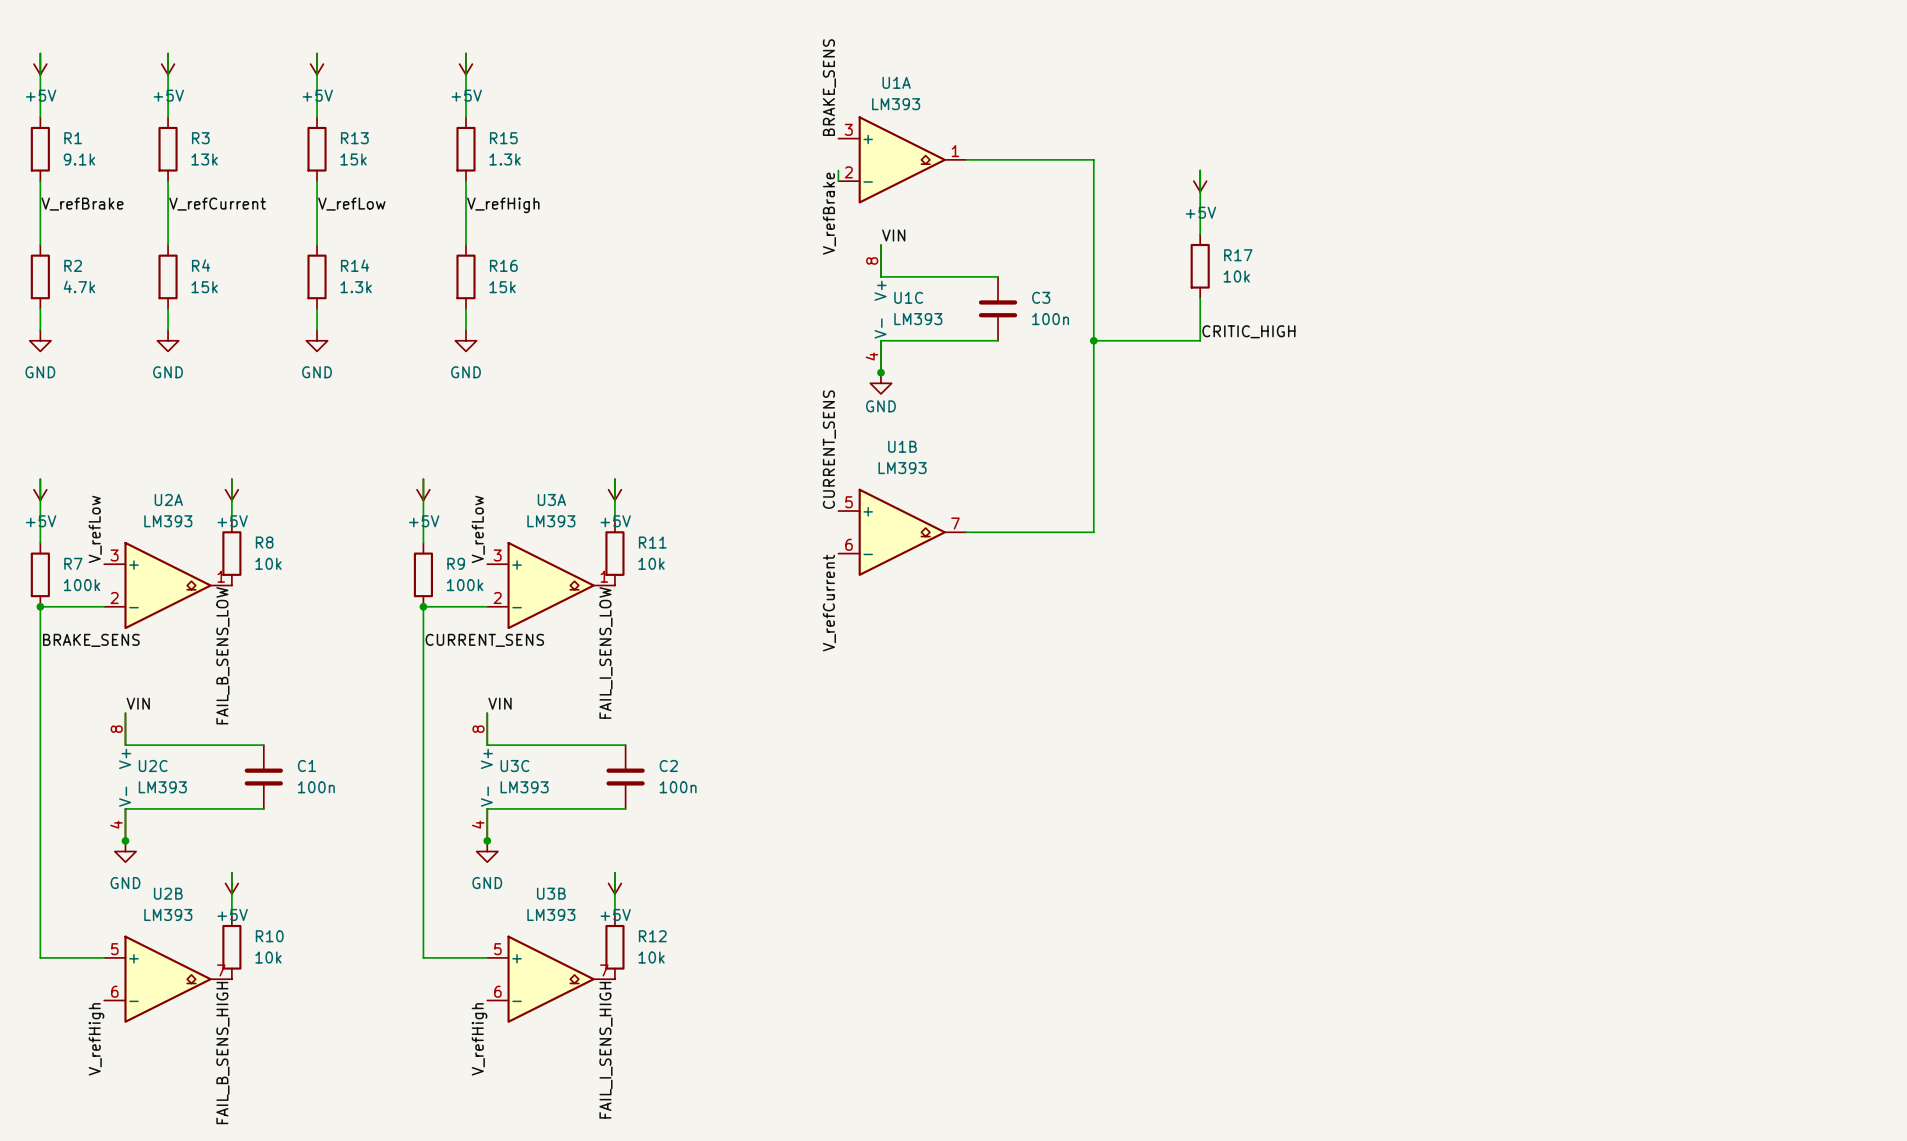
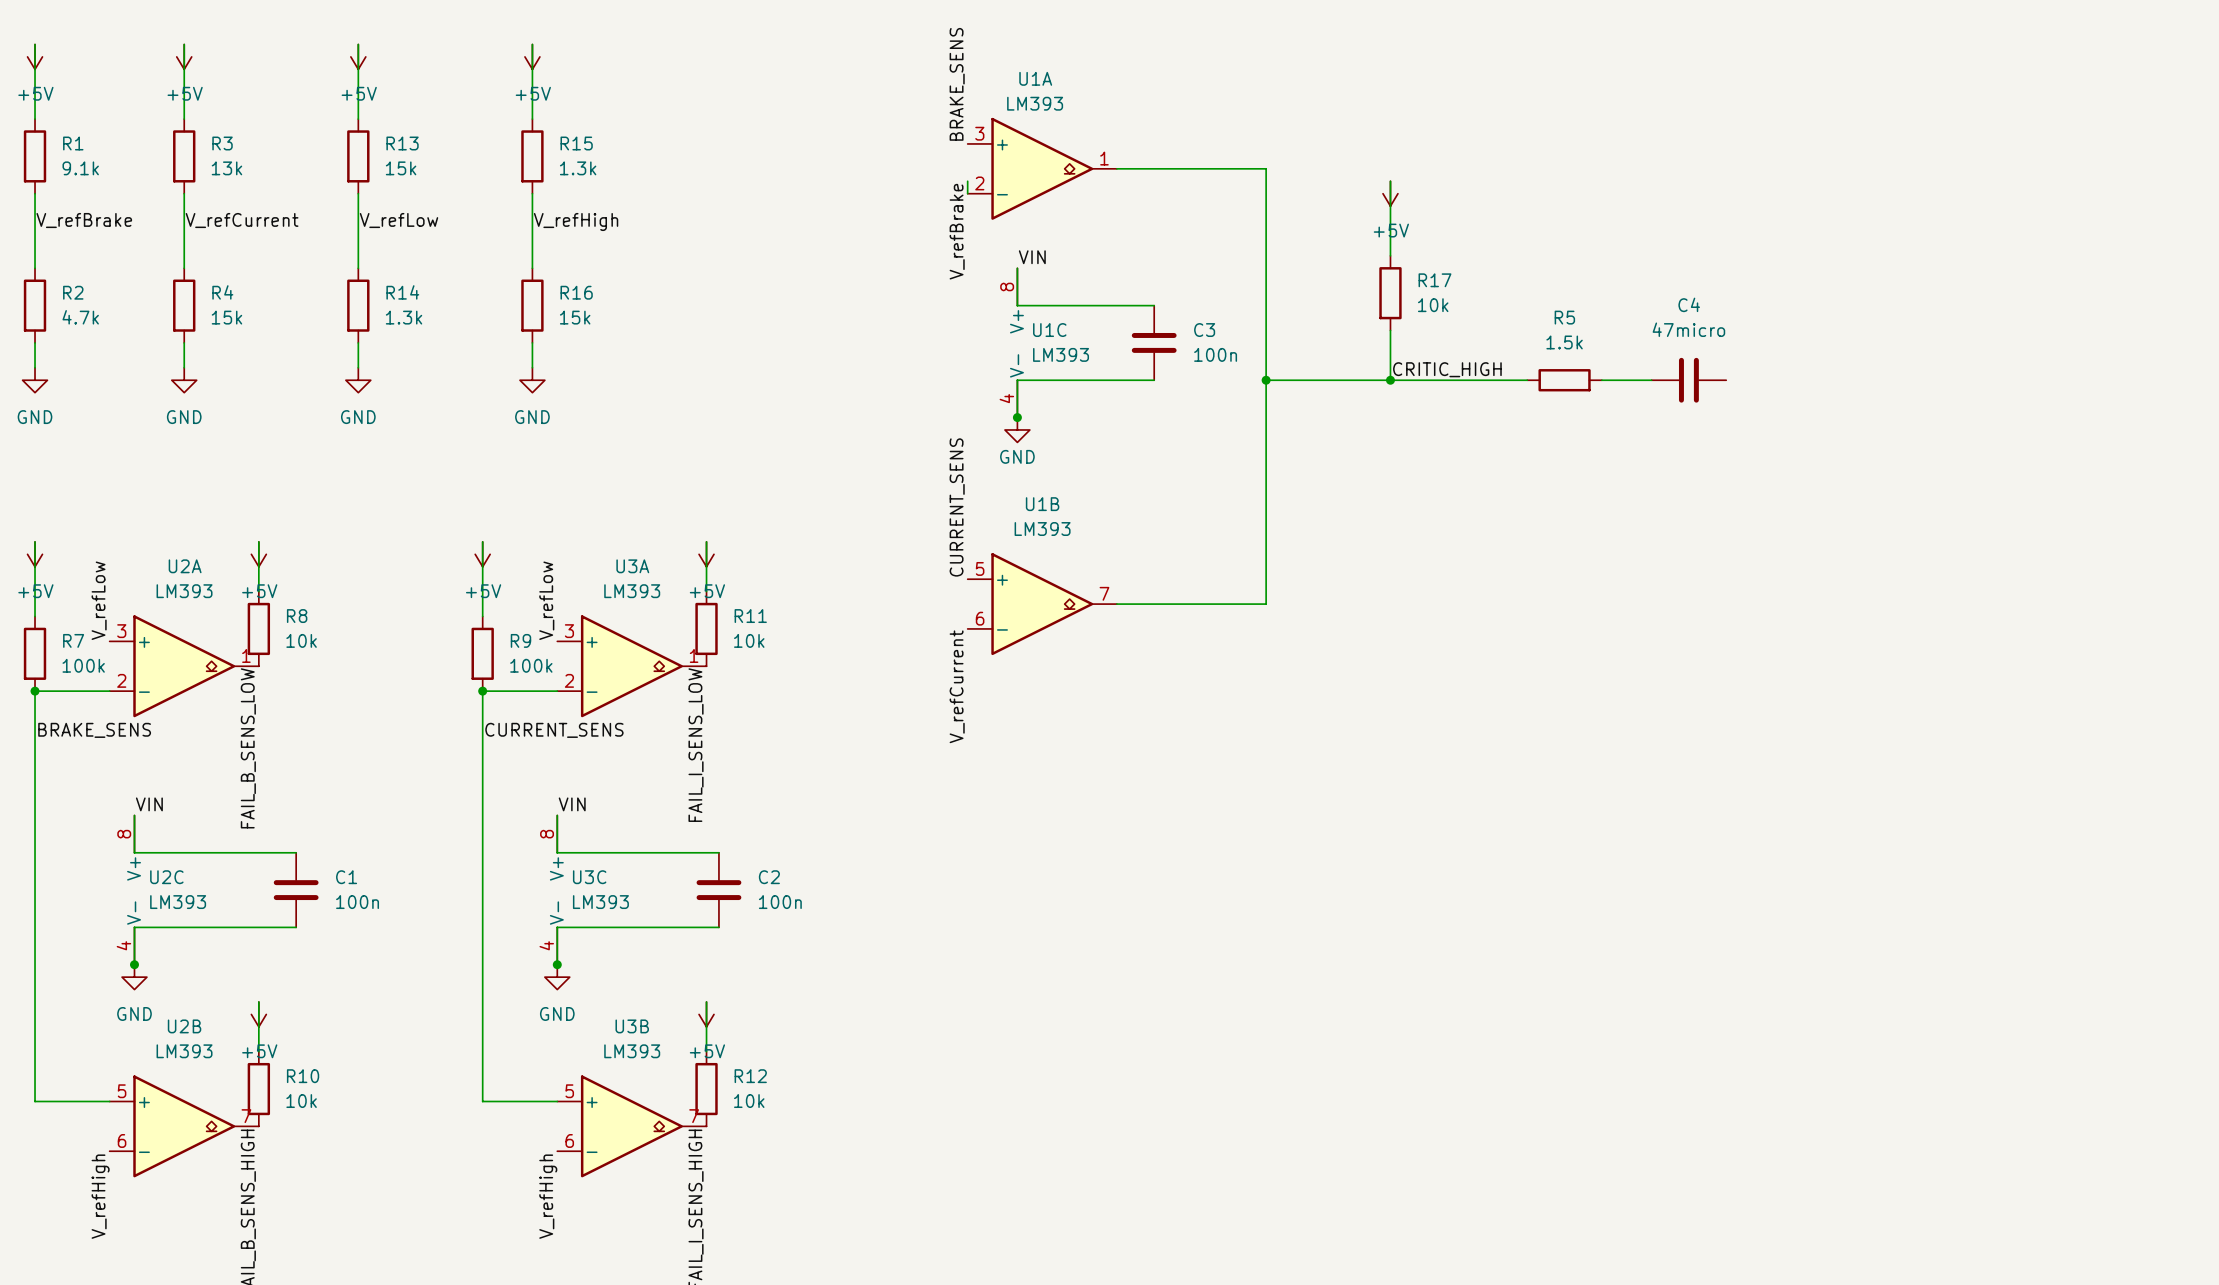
wire: none -> (1390, 380) (1527, 380)
junction: none -> (1390, 380)
R5: none -> 1.5k (1564, 380)
wire: none -> (1601, 380) (1651, 380)
C4: none -> 47micro (1688, 380)

